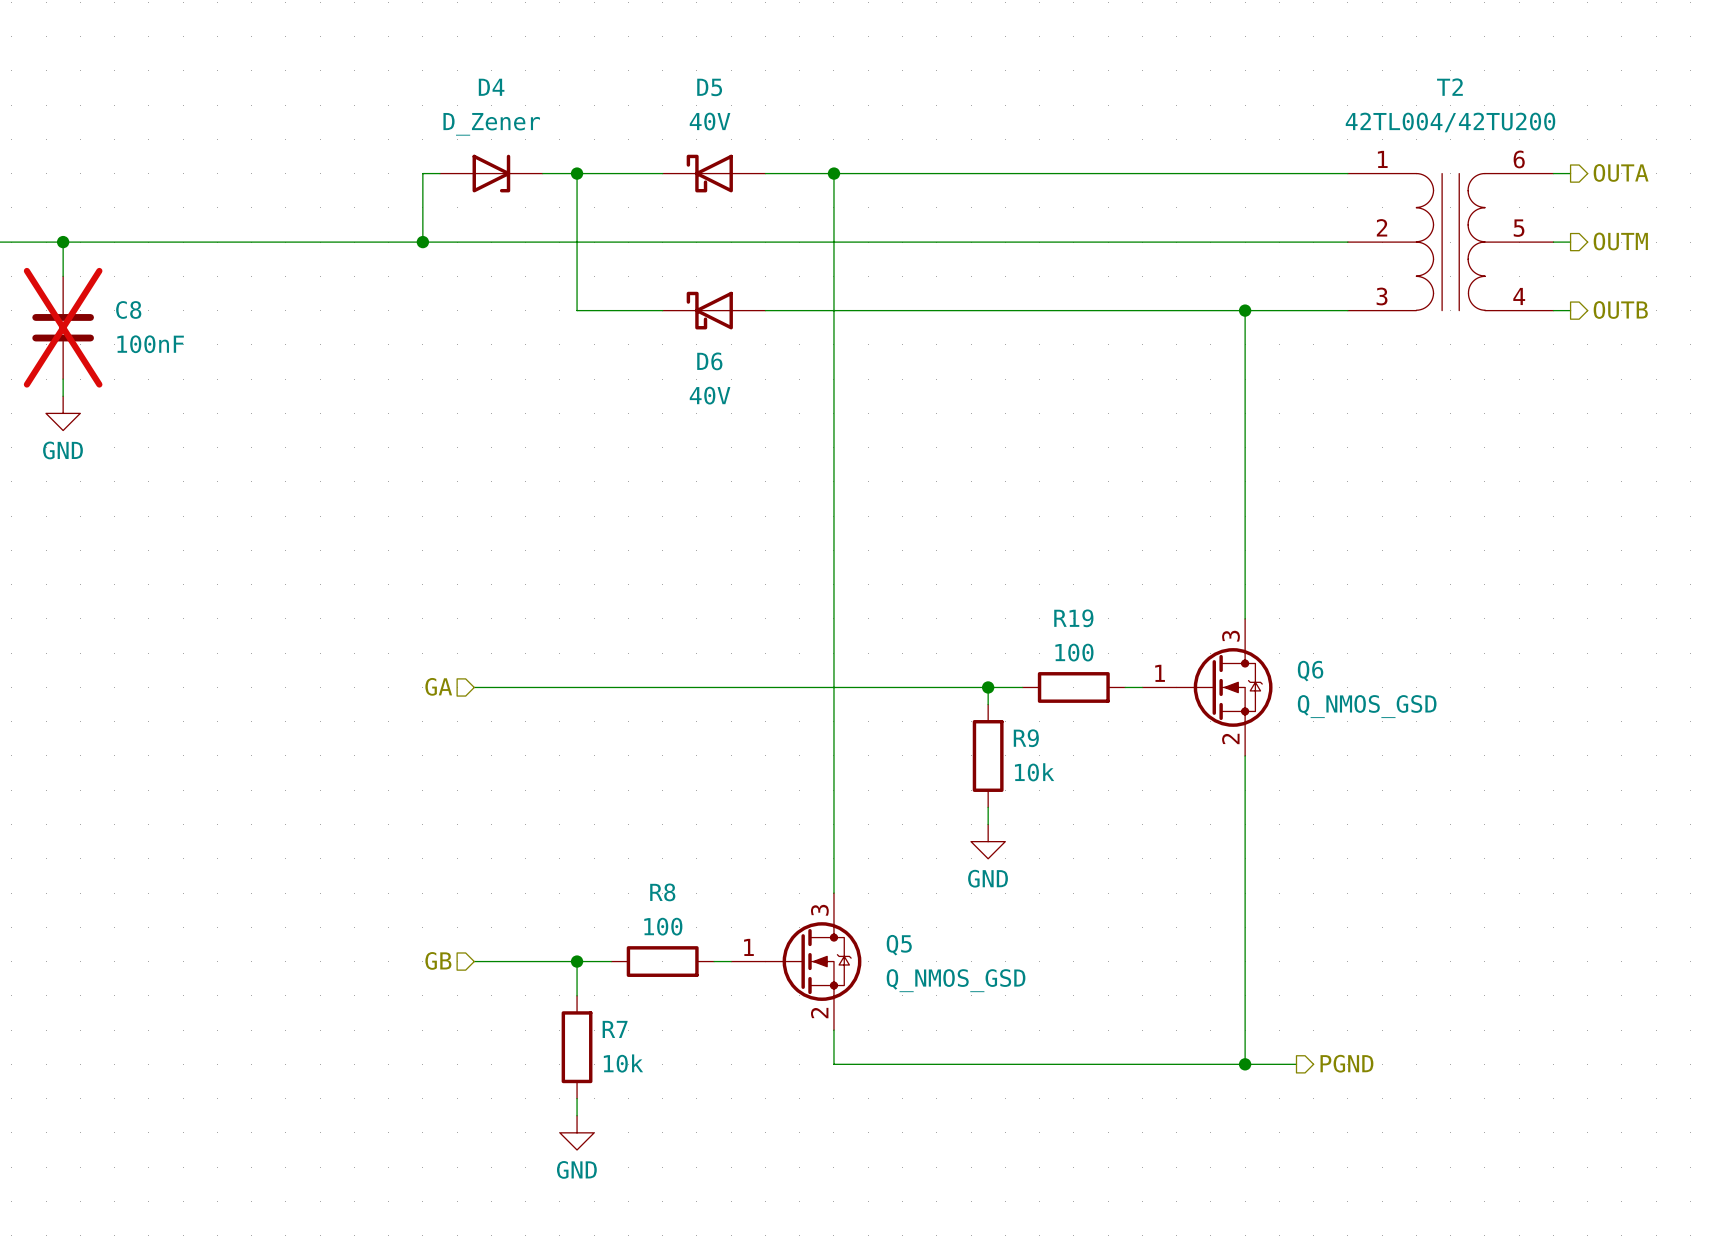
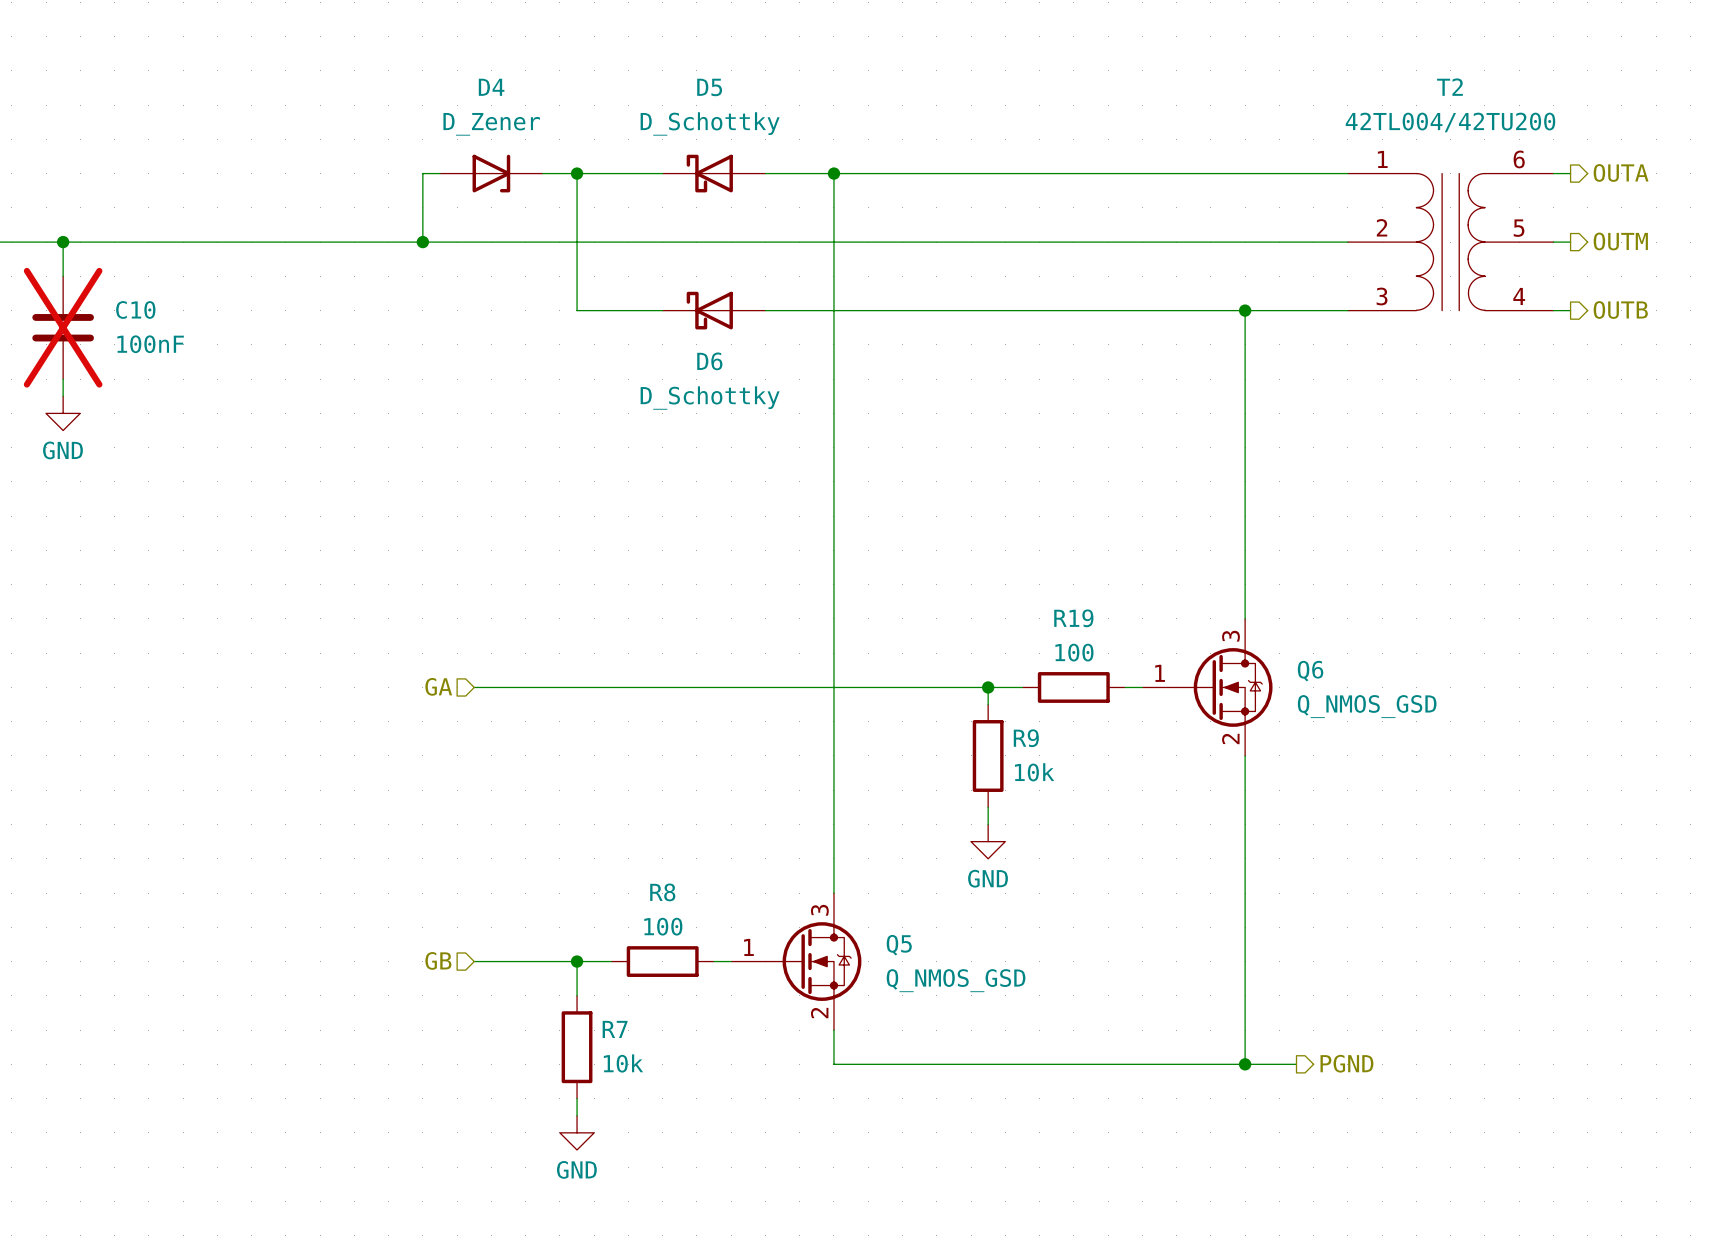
D5 value: 40V (710, 121) -> D_Schottky (710, 123)
C8 name: C8 (128, 309) -> C10 (135, 309)
D6 value: 40V (710, 395) -> D_Schottky (710, 398)

